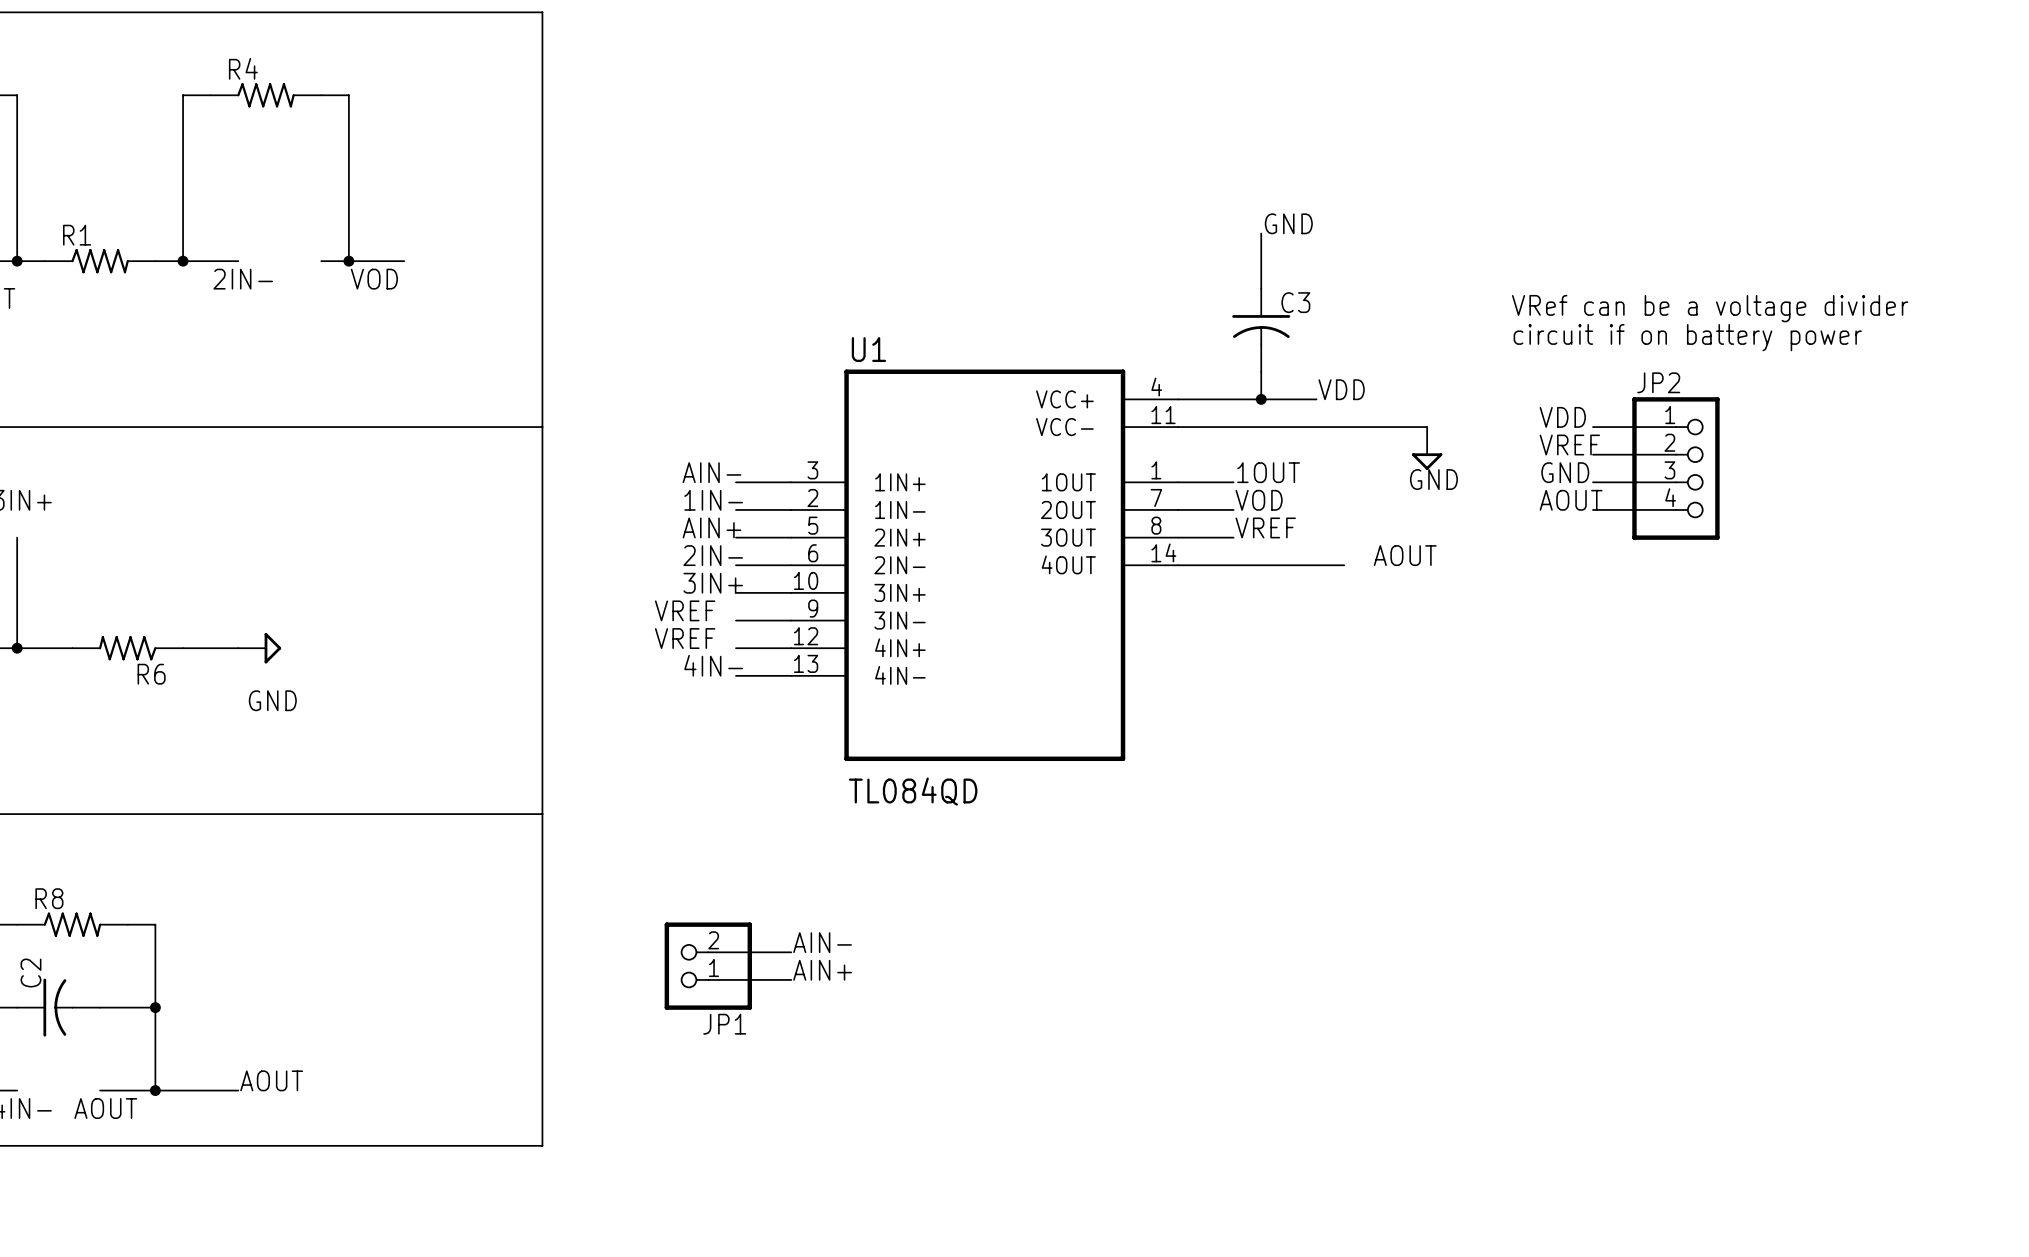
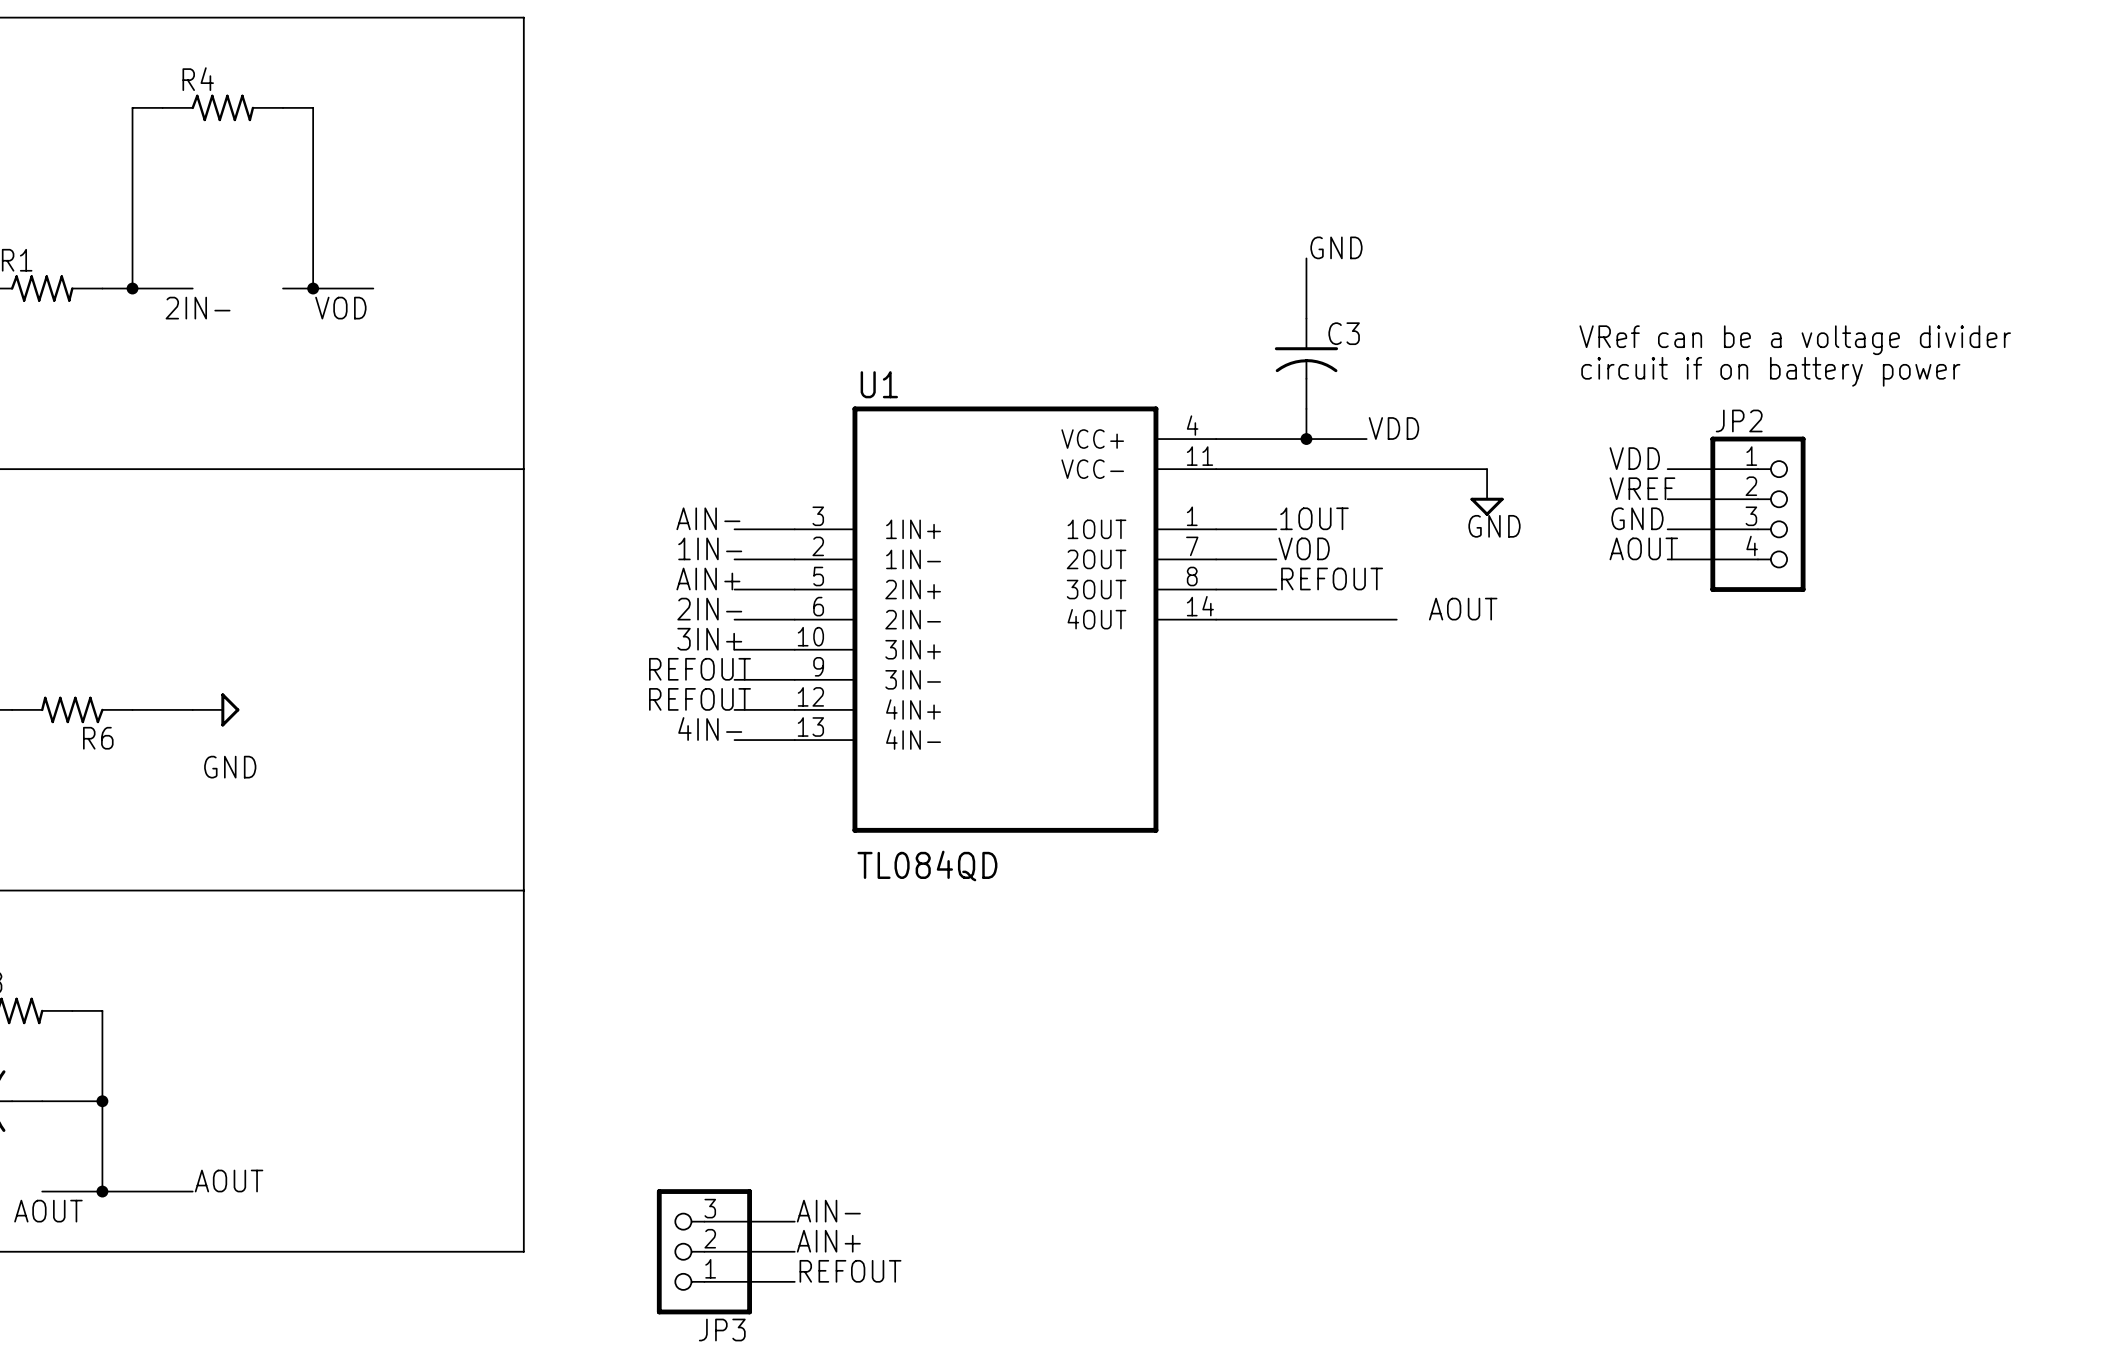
label: VREF (1265, 527) -> REFOUT (1332, 579)
label: VREF (685, 610) -> REFOUT (699, 669)
label: VREF (685, 638) -> REFOUT (699, 699)
label position: AIN- (822, 942) -> AIN- (828, 1211)
wire: (708, 952) (791, 952) -> (704, 1251) (794, 1251)
JP1: (708, 966) -> none
label position: AIN+ (822, 970) -> AIN+ (828, 1241)
wire: (708, 979) (791, 979) -> (704, 1221) (794, 1221)
JP3: none -> (704, 1251)
label: none -> REFOUT (850, 1271)
wire: none -> (704, 1281) (794, 1281)

